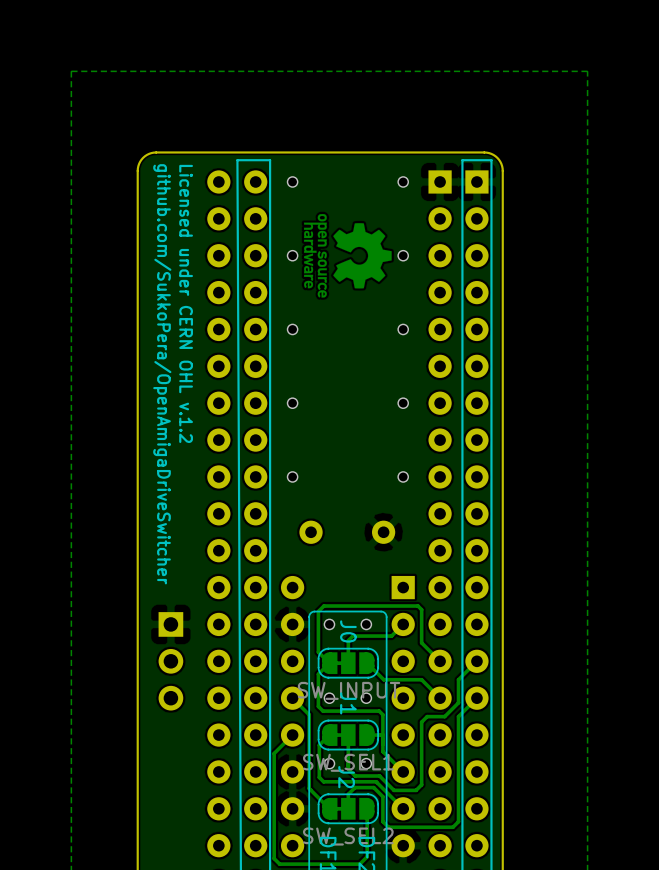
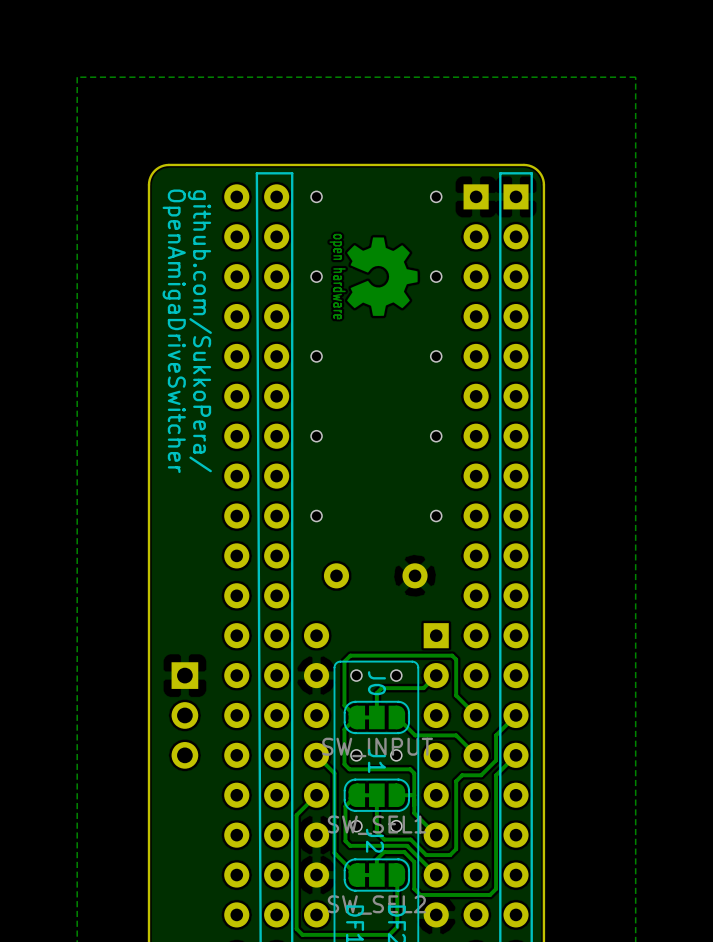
drawing shape: [304, 214, 392, 298] -> [329, 233, 418, 320]
text: Licensed under CERN OHL v.1.2 (186, 303) -> github.com/SukkoPera/ (199, 331)
text: github.com/SukkoPera/OpenAmigaDriveSwitcher (162, 374) -> OpenAmigaDriveSwitcher (174, 331)

